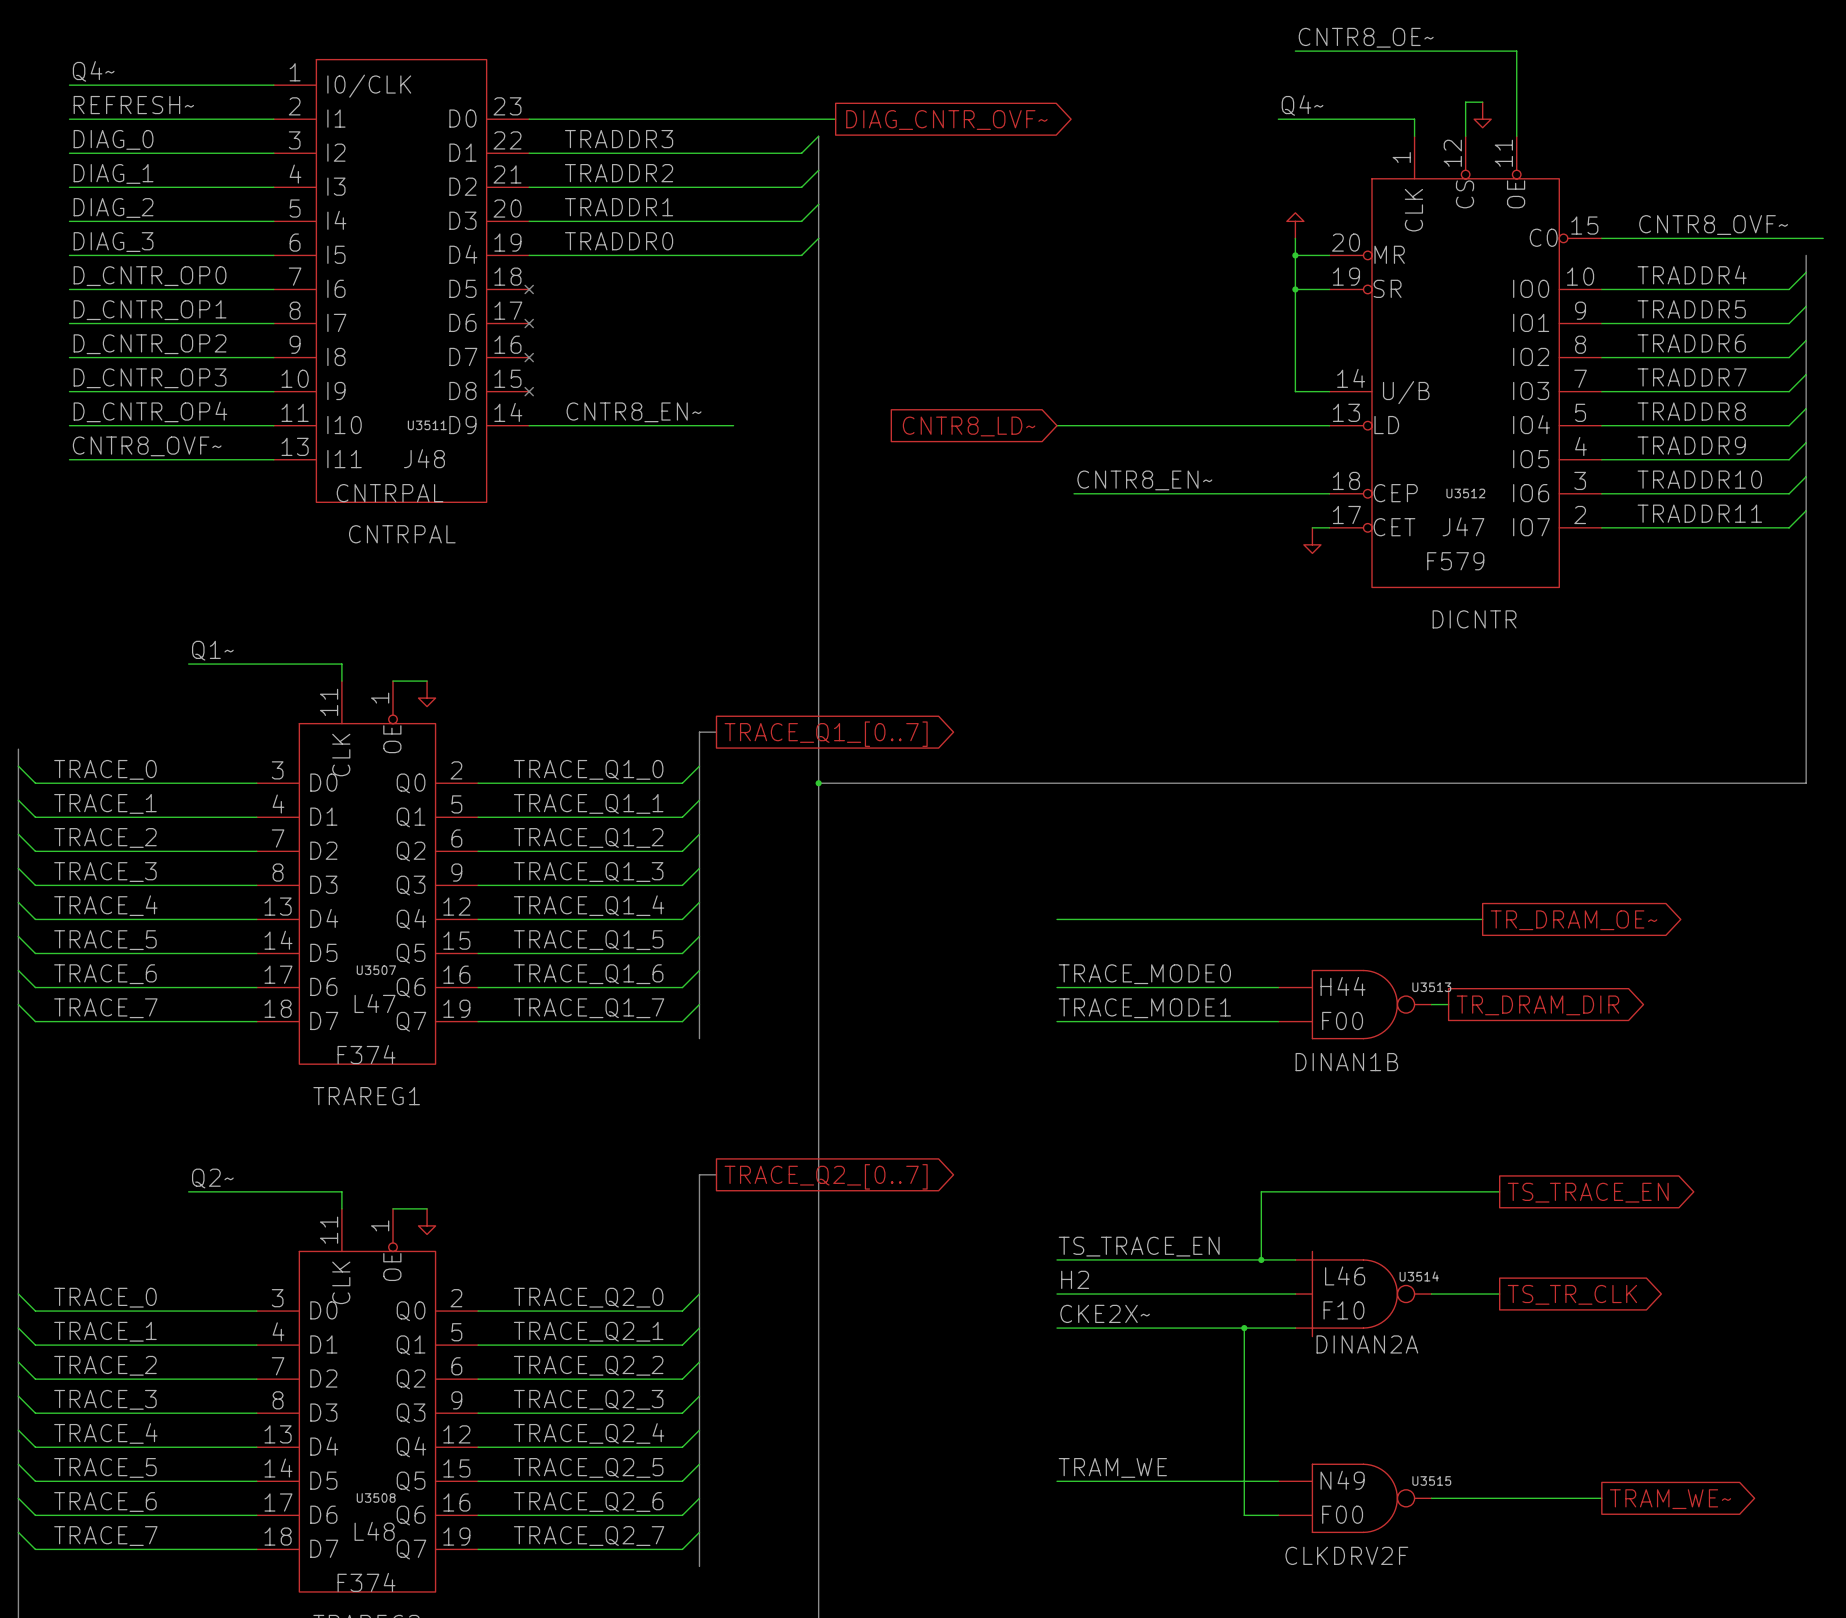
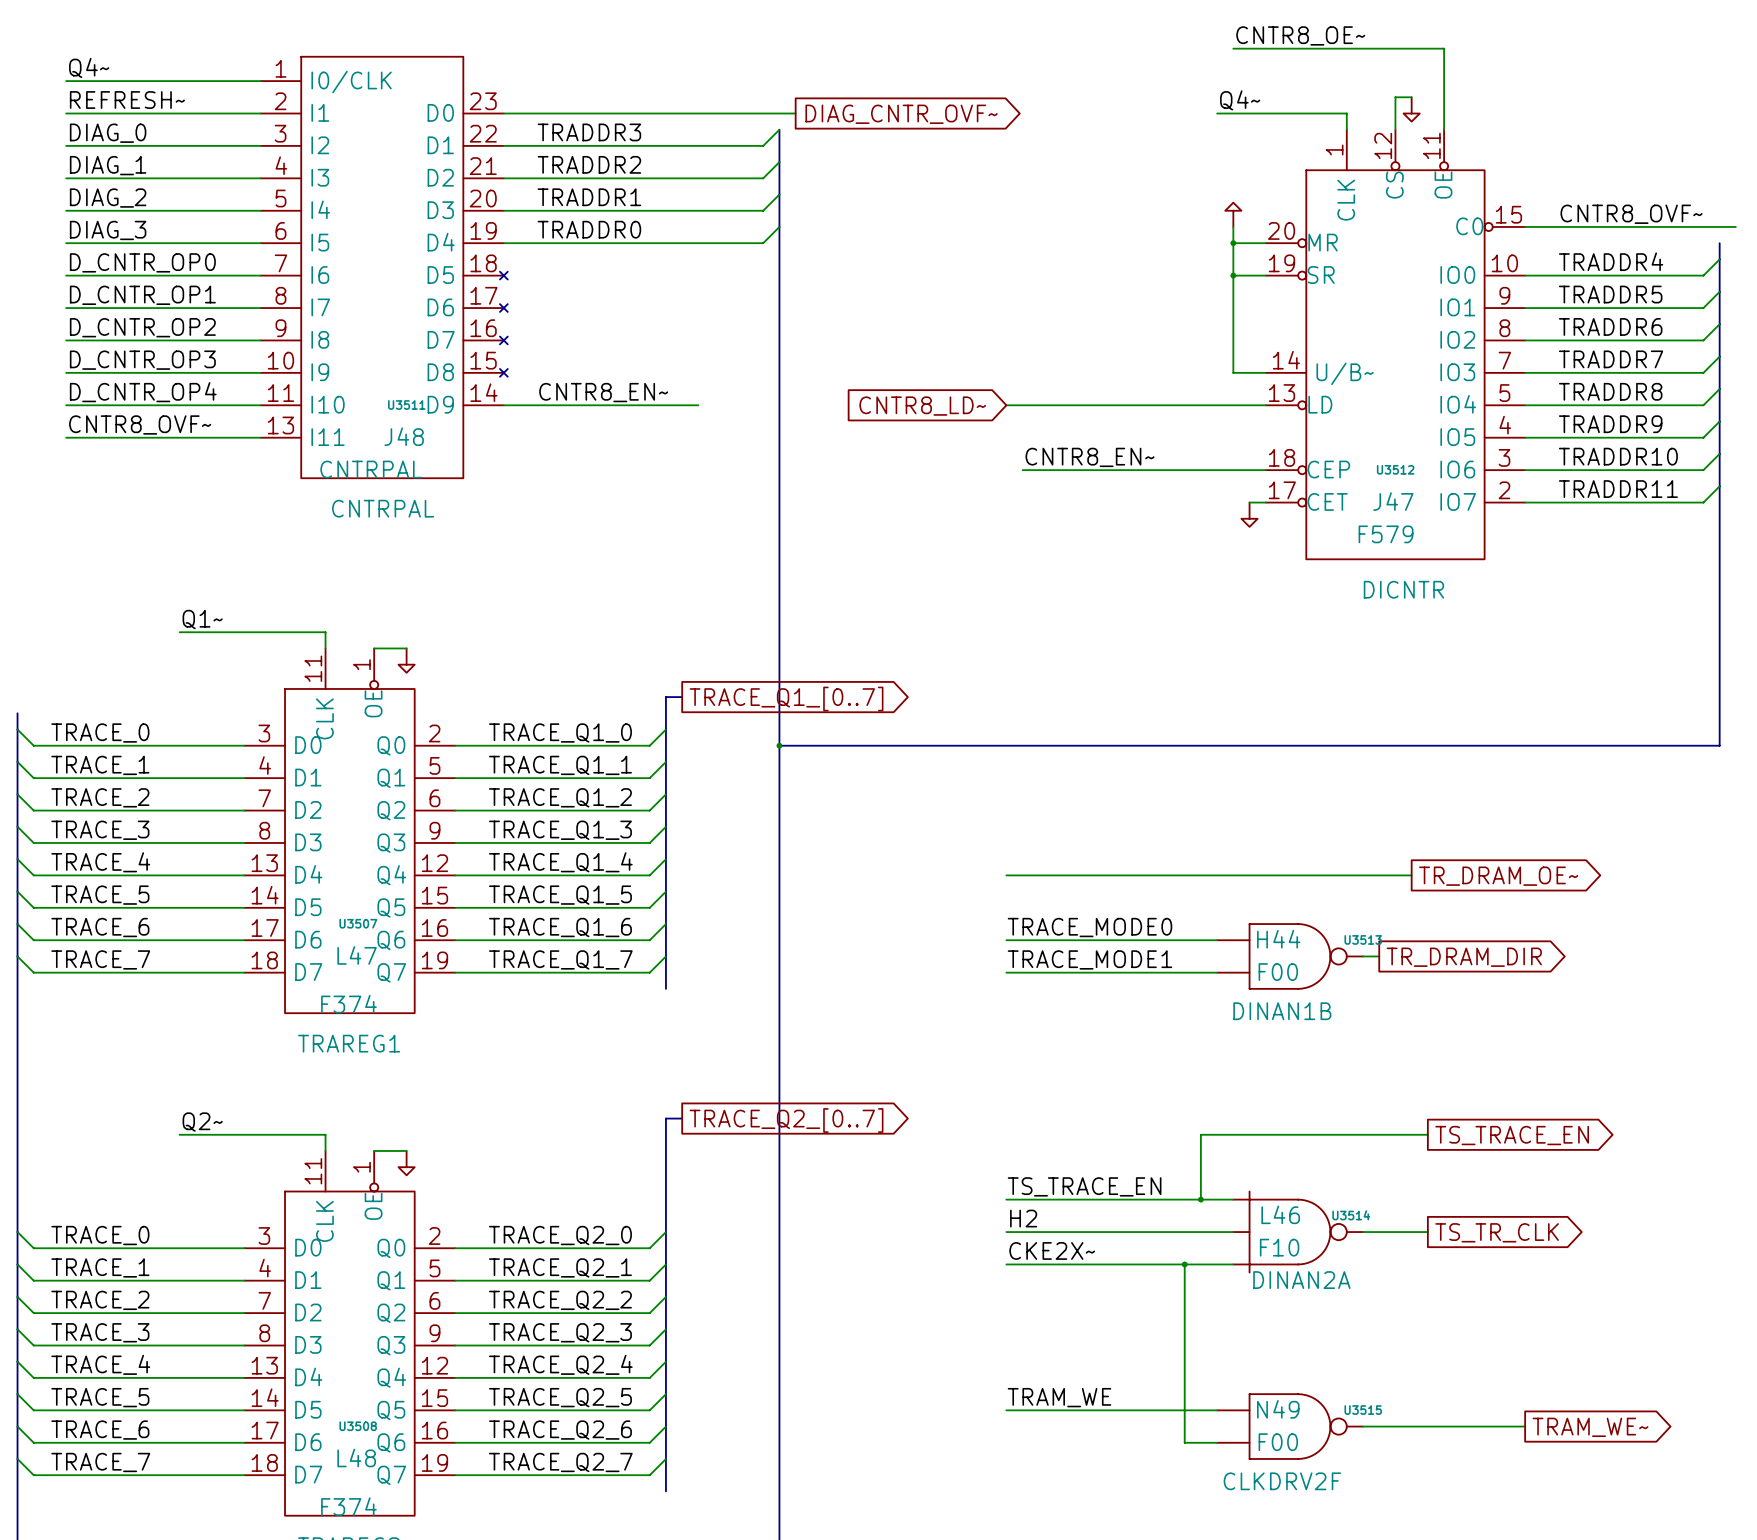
U3512 pin name: U/B (1406, 392) -> U/B~ (1345, 373)

